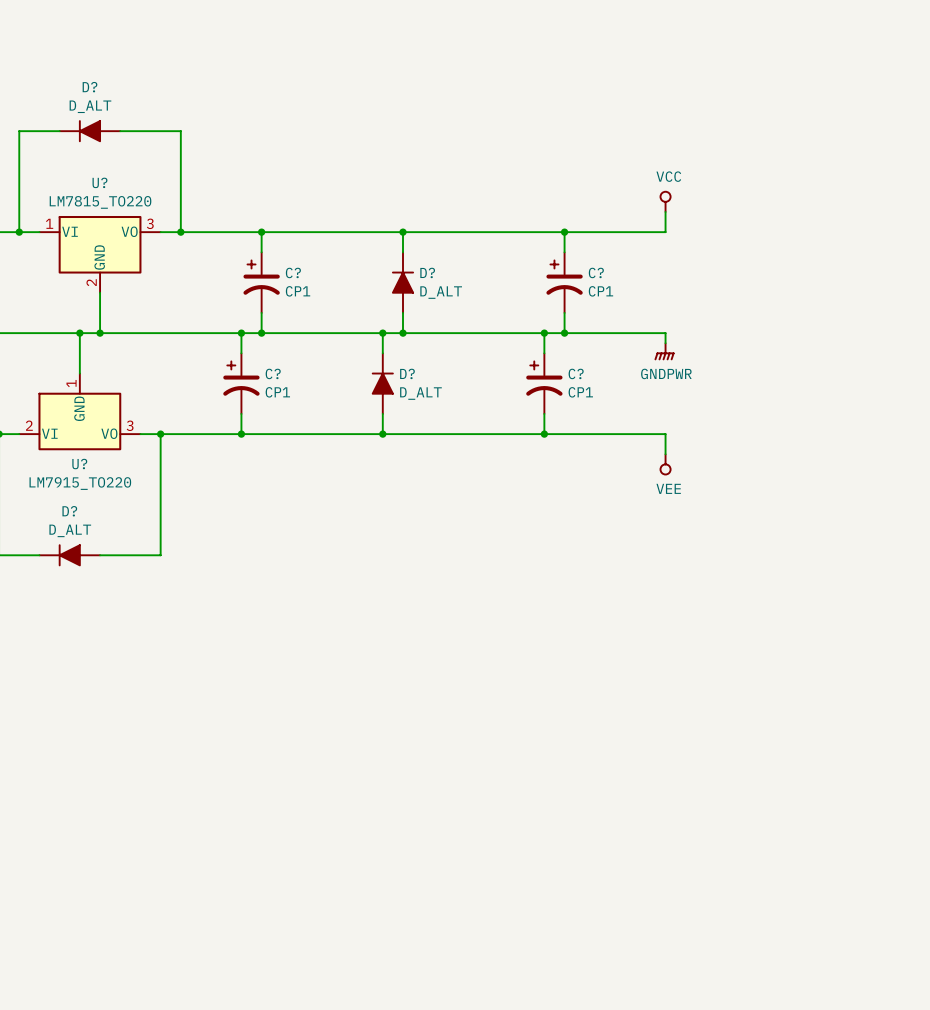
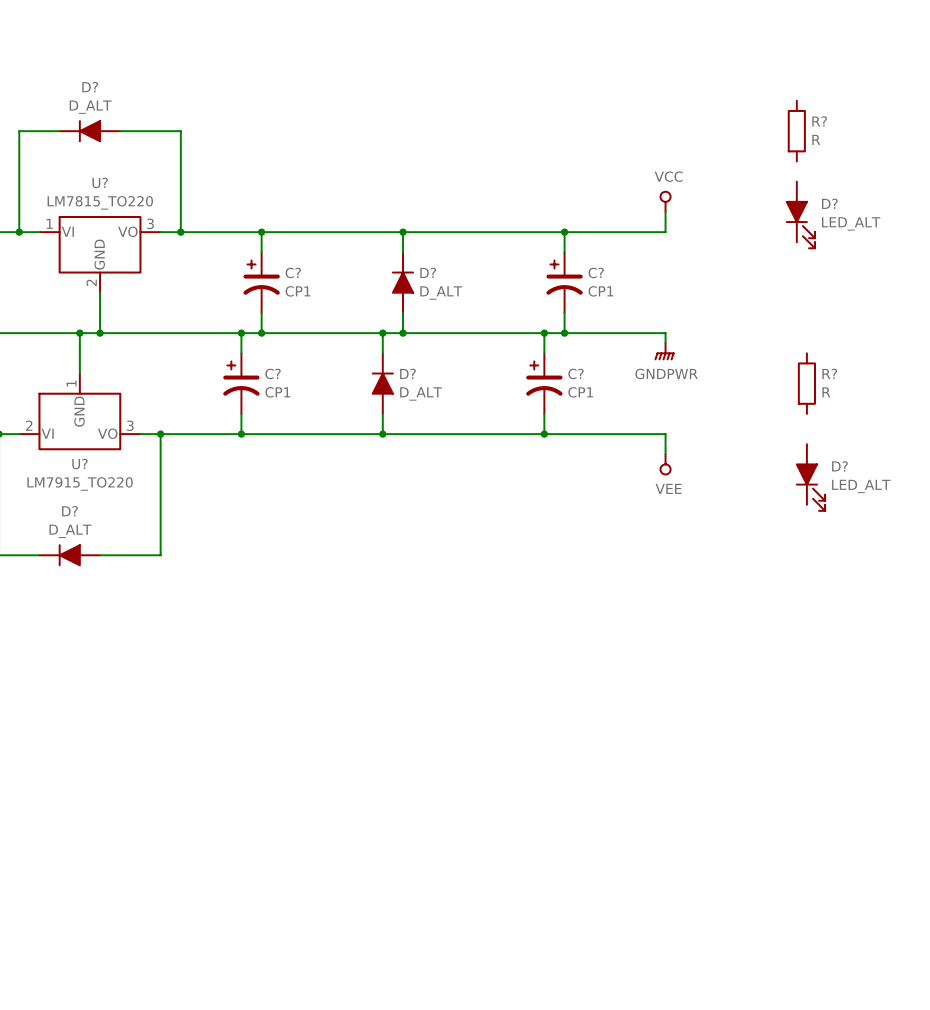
R?: none -> R (796, 131)
D?: none -> LED_ALT (800, 214)
R?: none -> R (806, 383)
D?: none -> LED_ALT (810, 477)

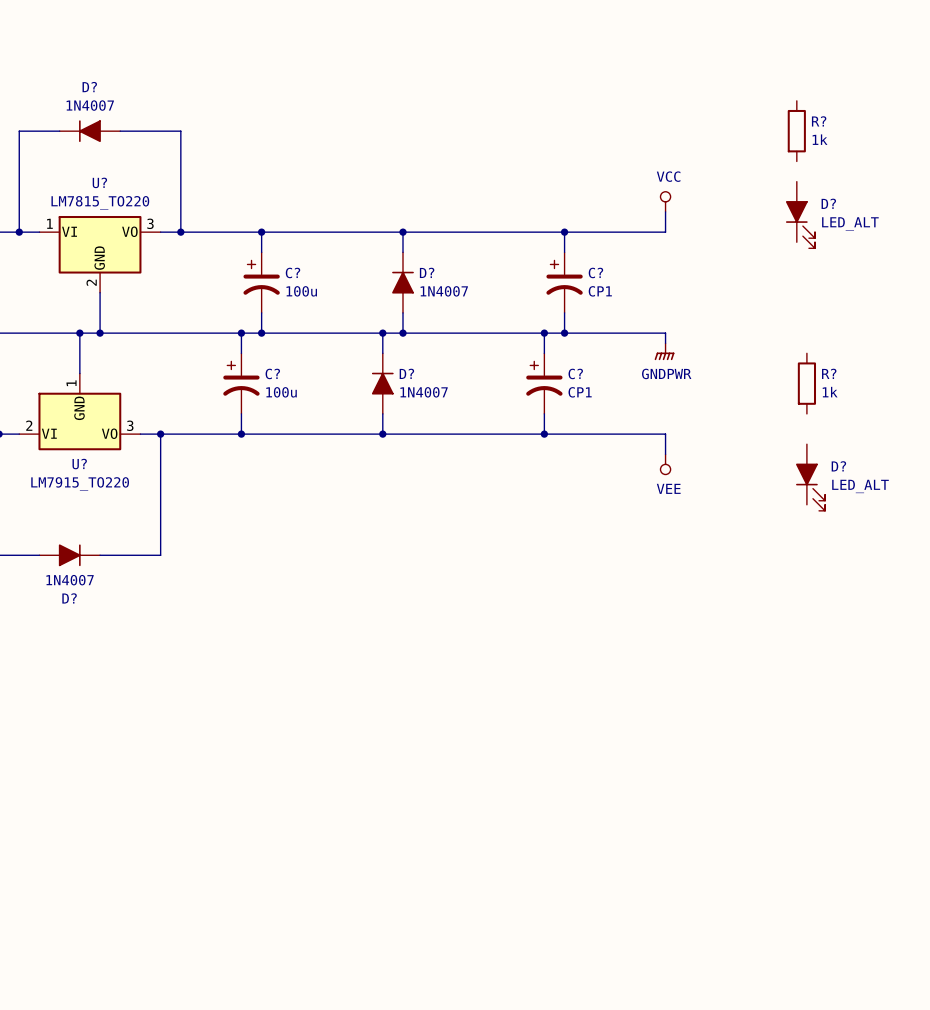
D? value: D_ALT (90, 107) -> 1N4007 (90, 105)
R? value: R (816, 139) -> 1k (820, 139)
C? value: CP1 (298, 291) -> 100u (301, 291)
D? value: D_ALT (441, 292) -> 1N4007 (444, 291)
C? value: CP1 (277, 392) -> 100u (281, 392)
R? value: R (826, 392) -> 1k (830, 392)
D? value: D_ALT (421, 393) -> 1N4007 (424, 392)
D? value: D_ALT (70, 531) -> 1N4007 (70, 580)
D? rotation: 0° (69, 555) -> 180° (69, 555)

